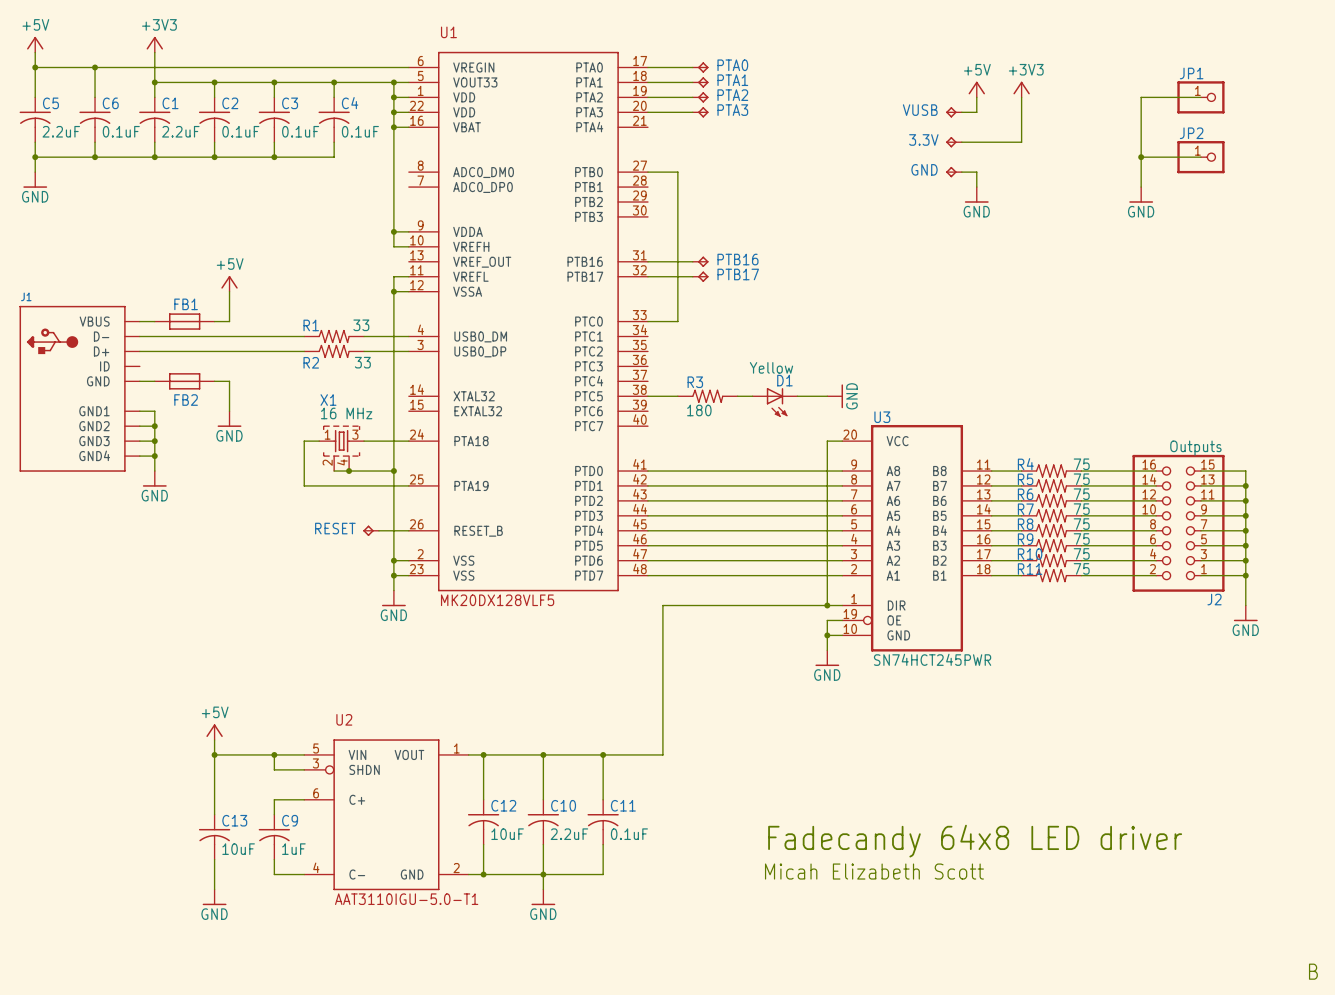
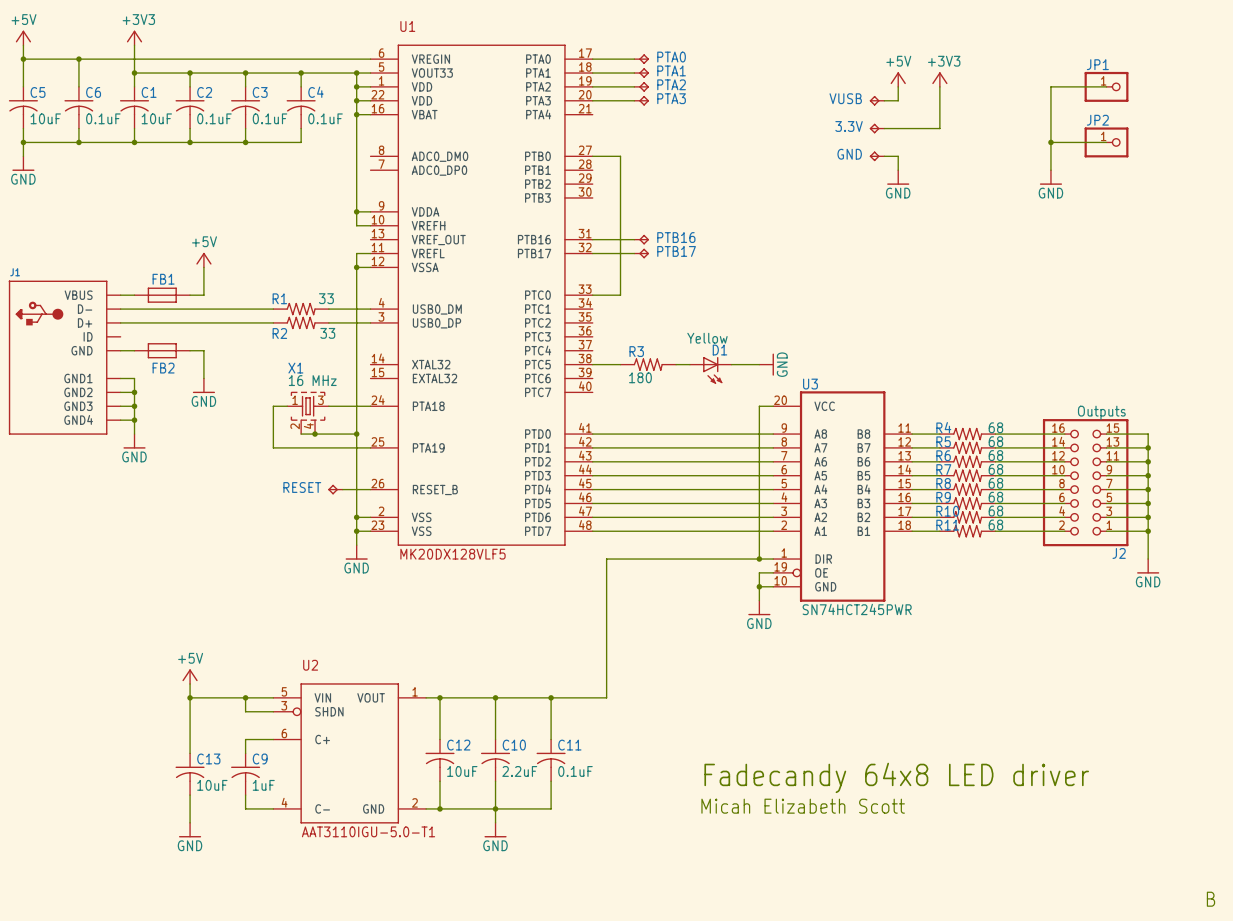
C5 value: 2.2uF (61, 131) -> 10uF (45, 118)
C1 value: 2.2uF (180, 131) -> 10uF (156, 118)
R4 value: 75 (1081, 464) -> 68 (995, 427)
R5 value: 75 (1081, 479) -> 68 (995, 441)
R6 value: 75 (1081, 494) -> 68 (995, 455)
R7 value: 75 (1081, 509) -> 68 (995, 469)
R8 value: 75 (1081, 524) -> 68 (995, 483)
R9 value: 75 (1081, 539) -> 68 (995, 497)
R10 value: 75 (1081, 553) -> 68 (995, 511)
R11 value: 75 (1081, 568) -> 68 (995, 524)

